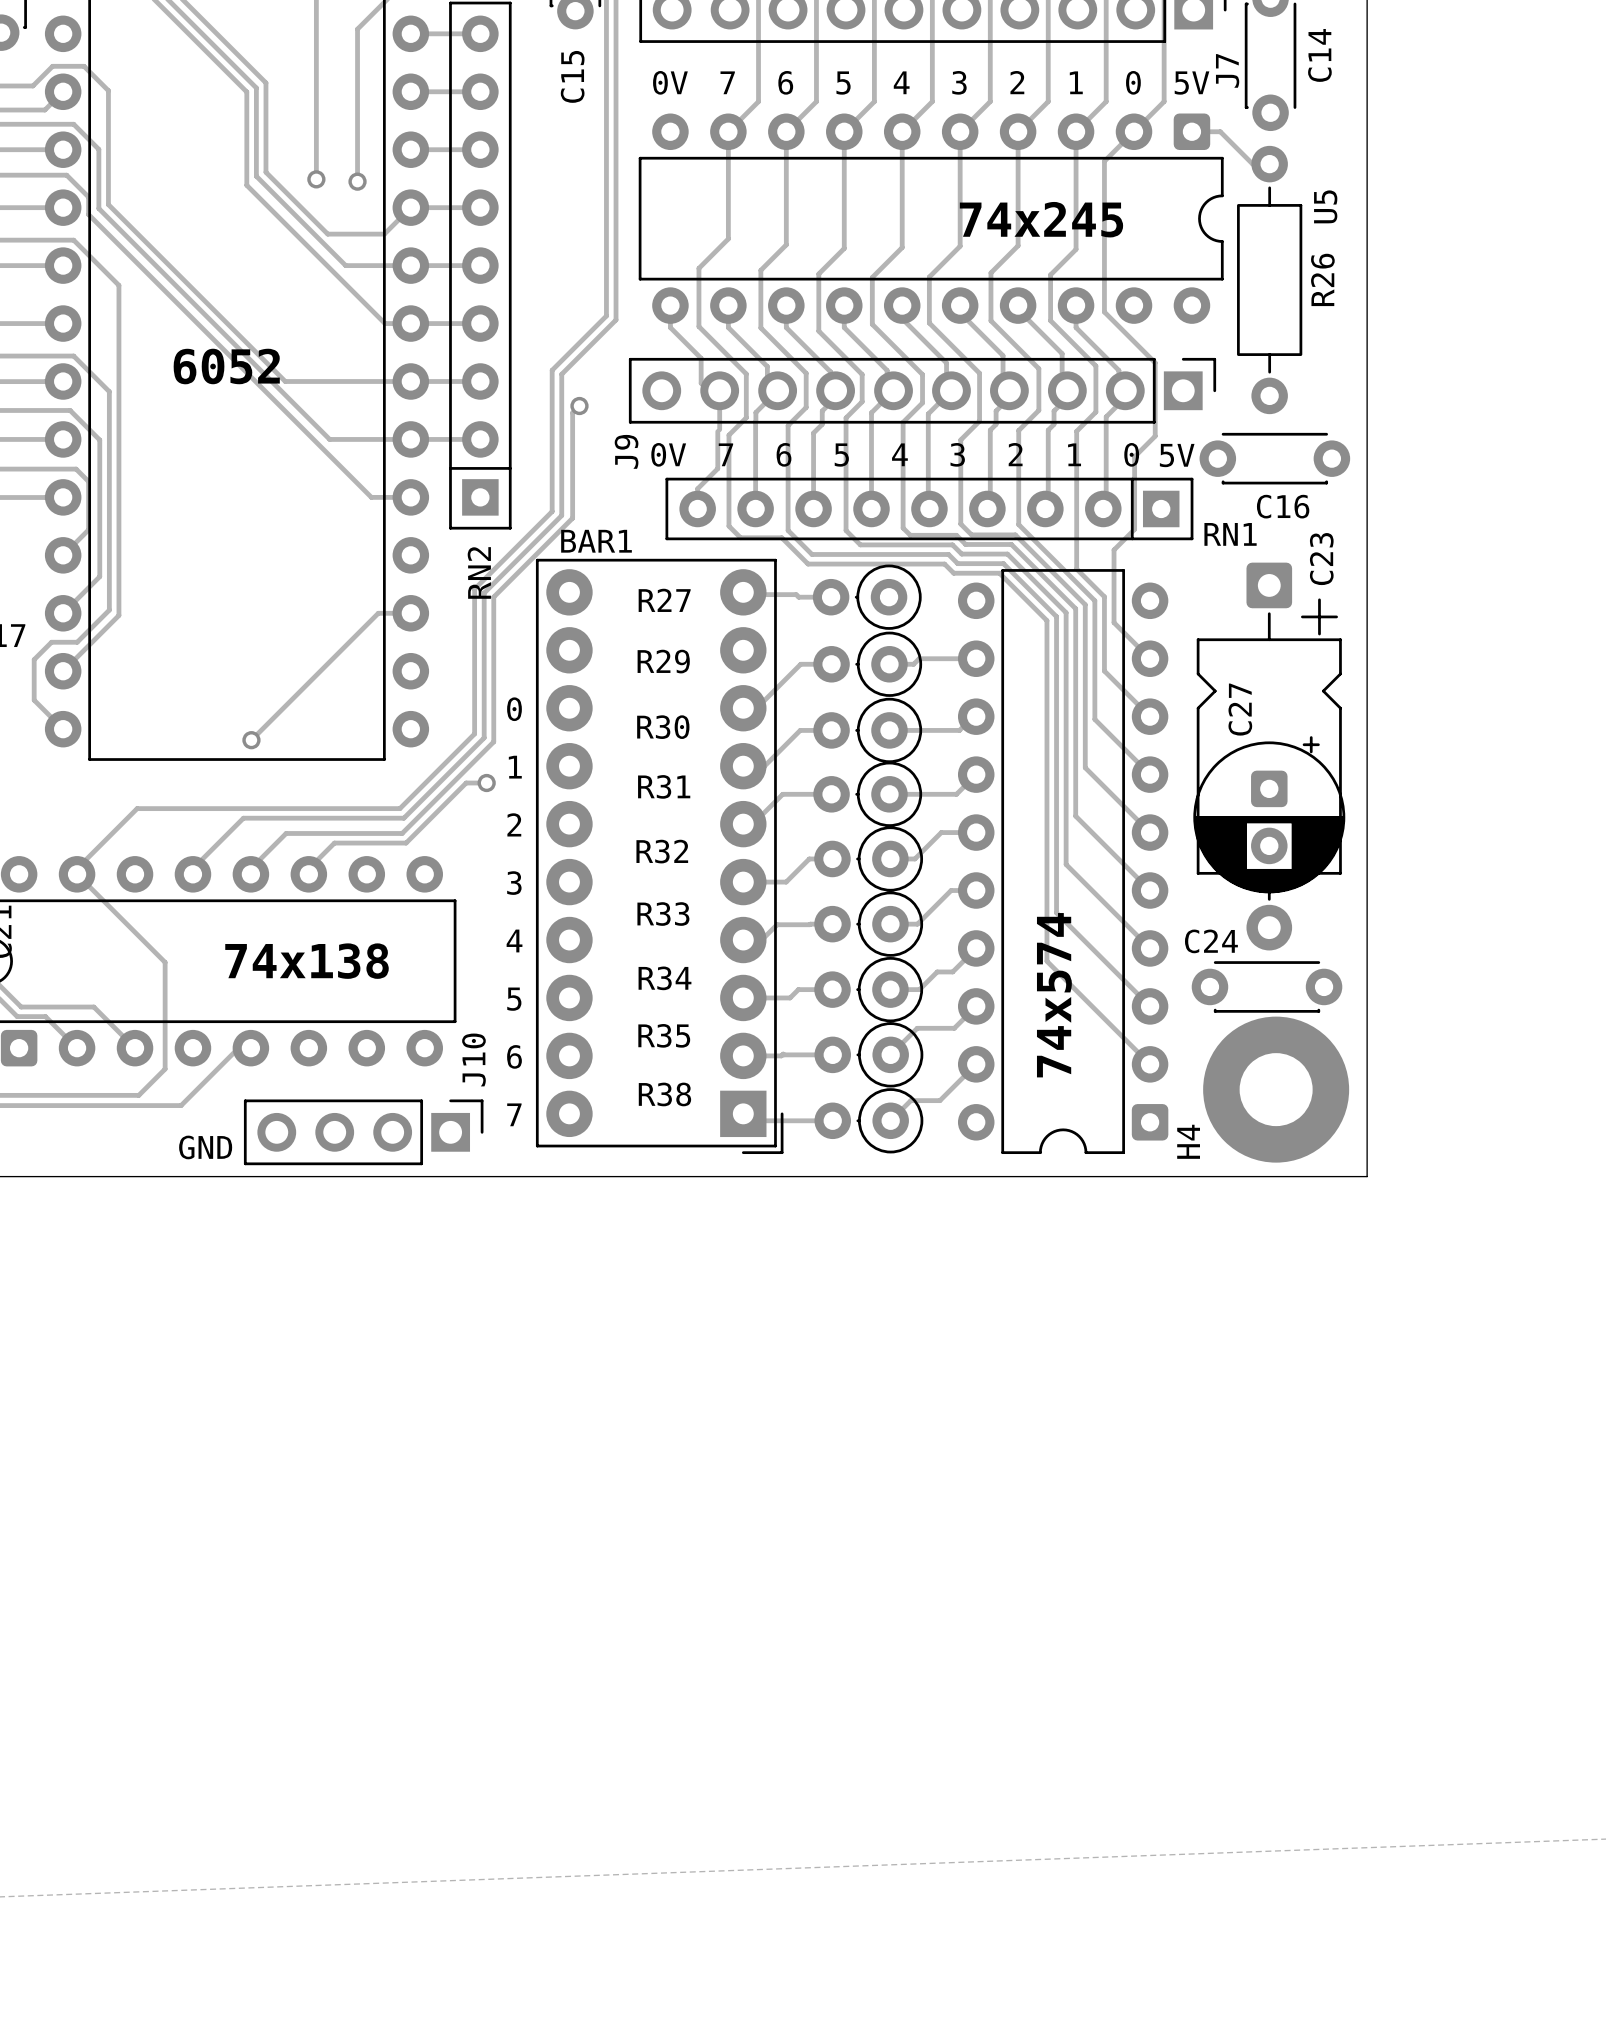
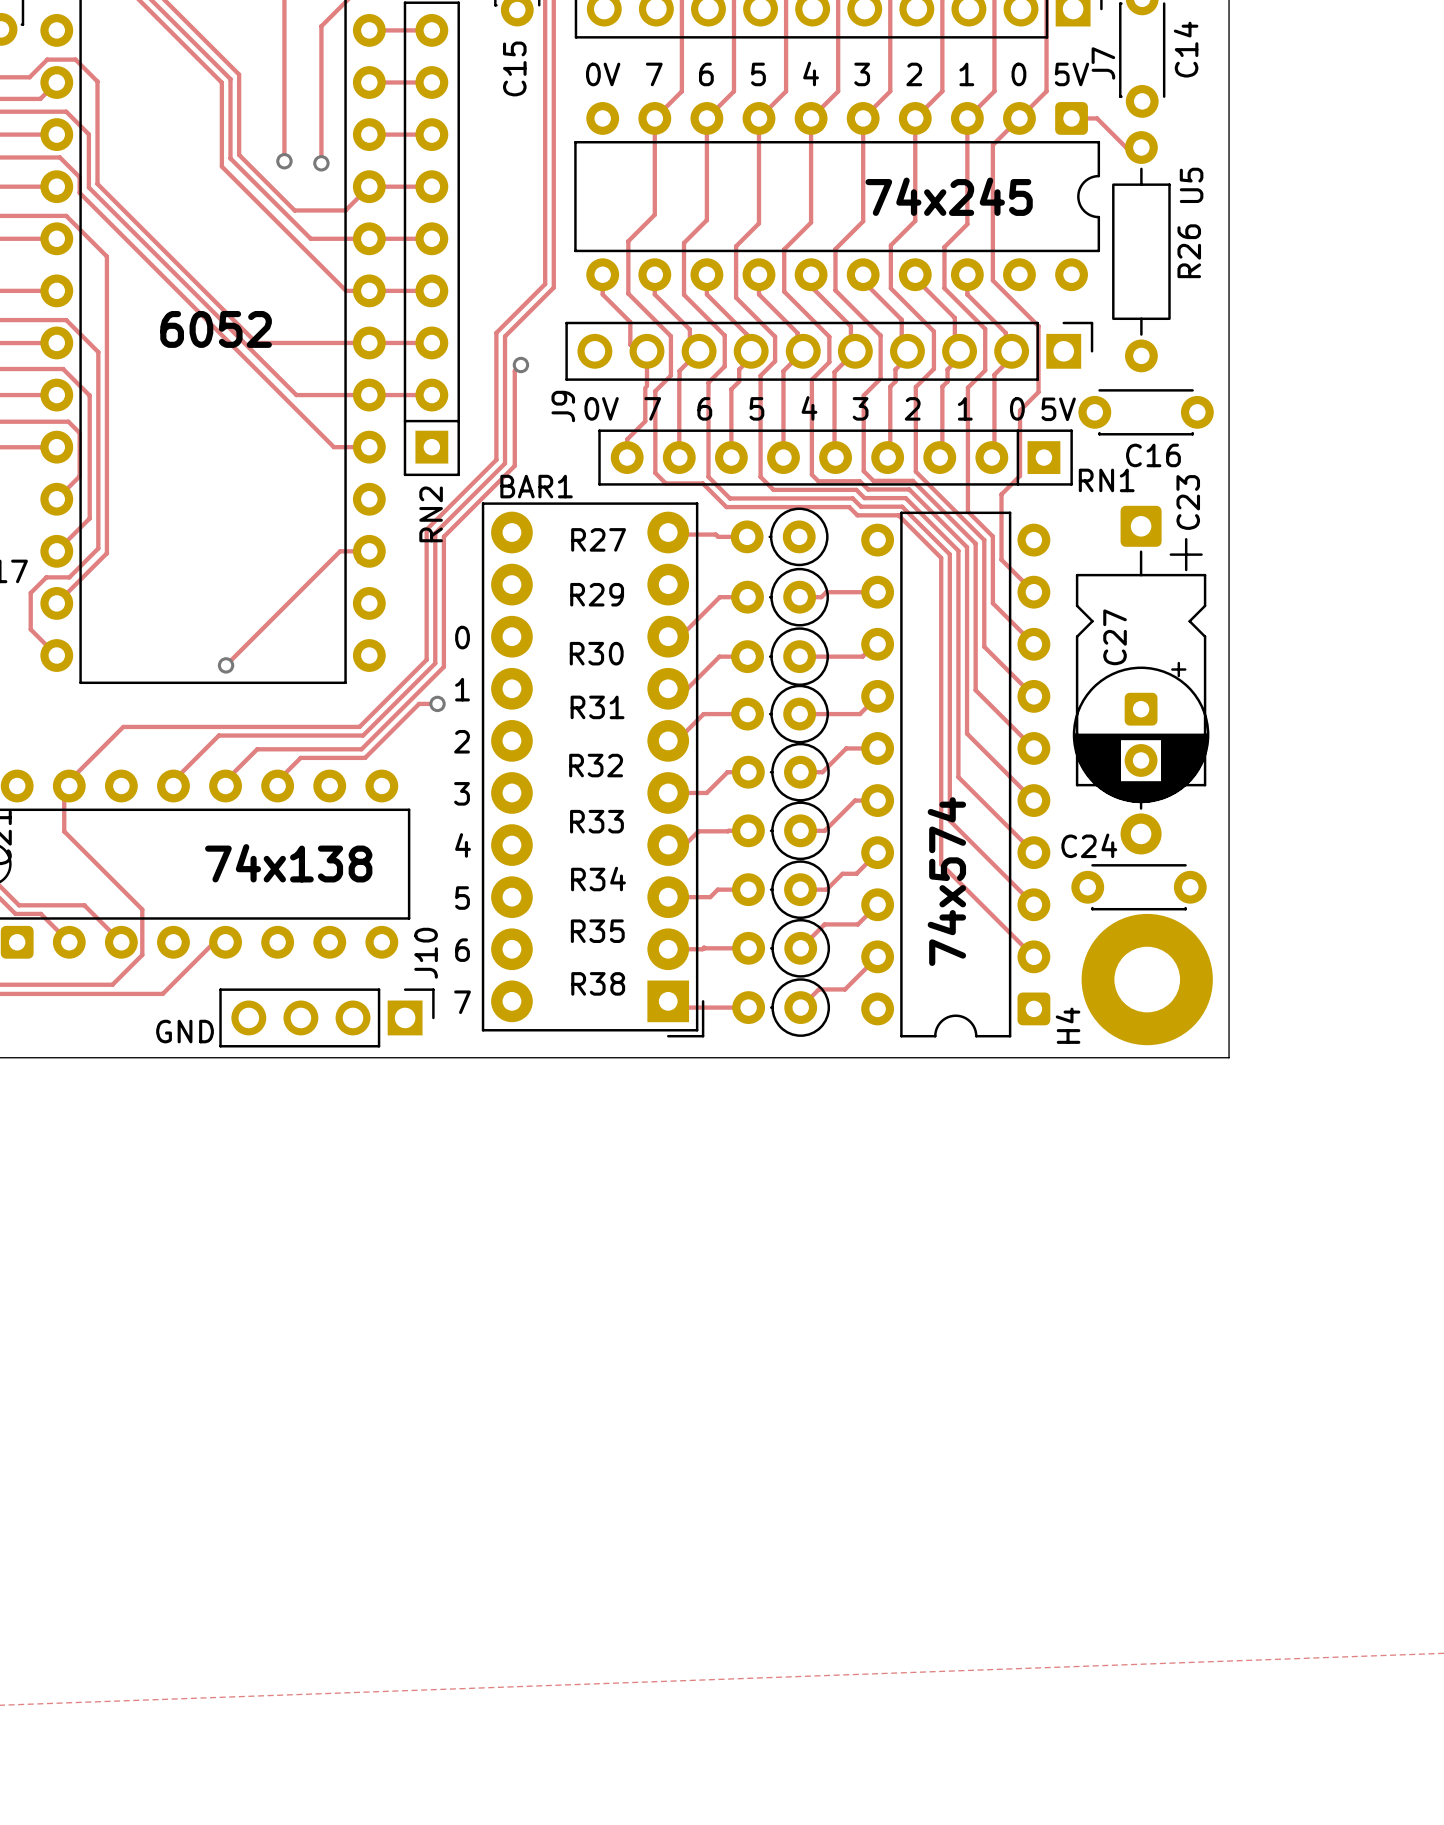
track: (74, 870) (165, 962) (165, 1069) (138, 1095) (125, 1095) -> (67, 783) (64, 786) (64, 831) (142, 909) (142, 955) (112, 984)

